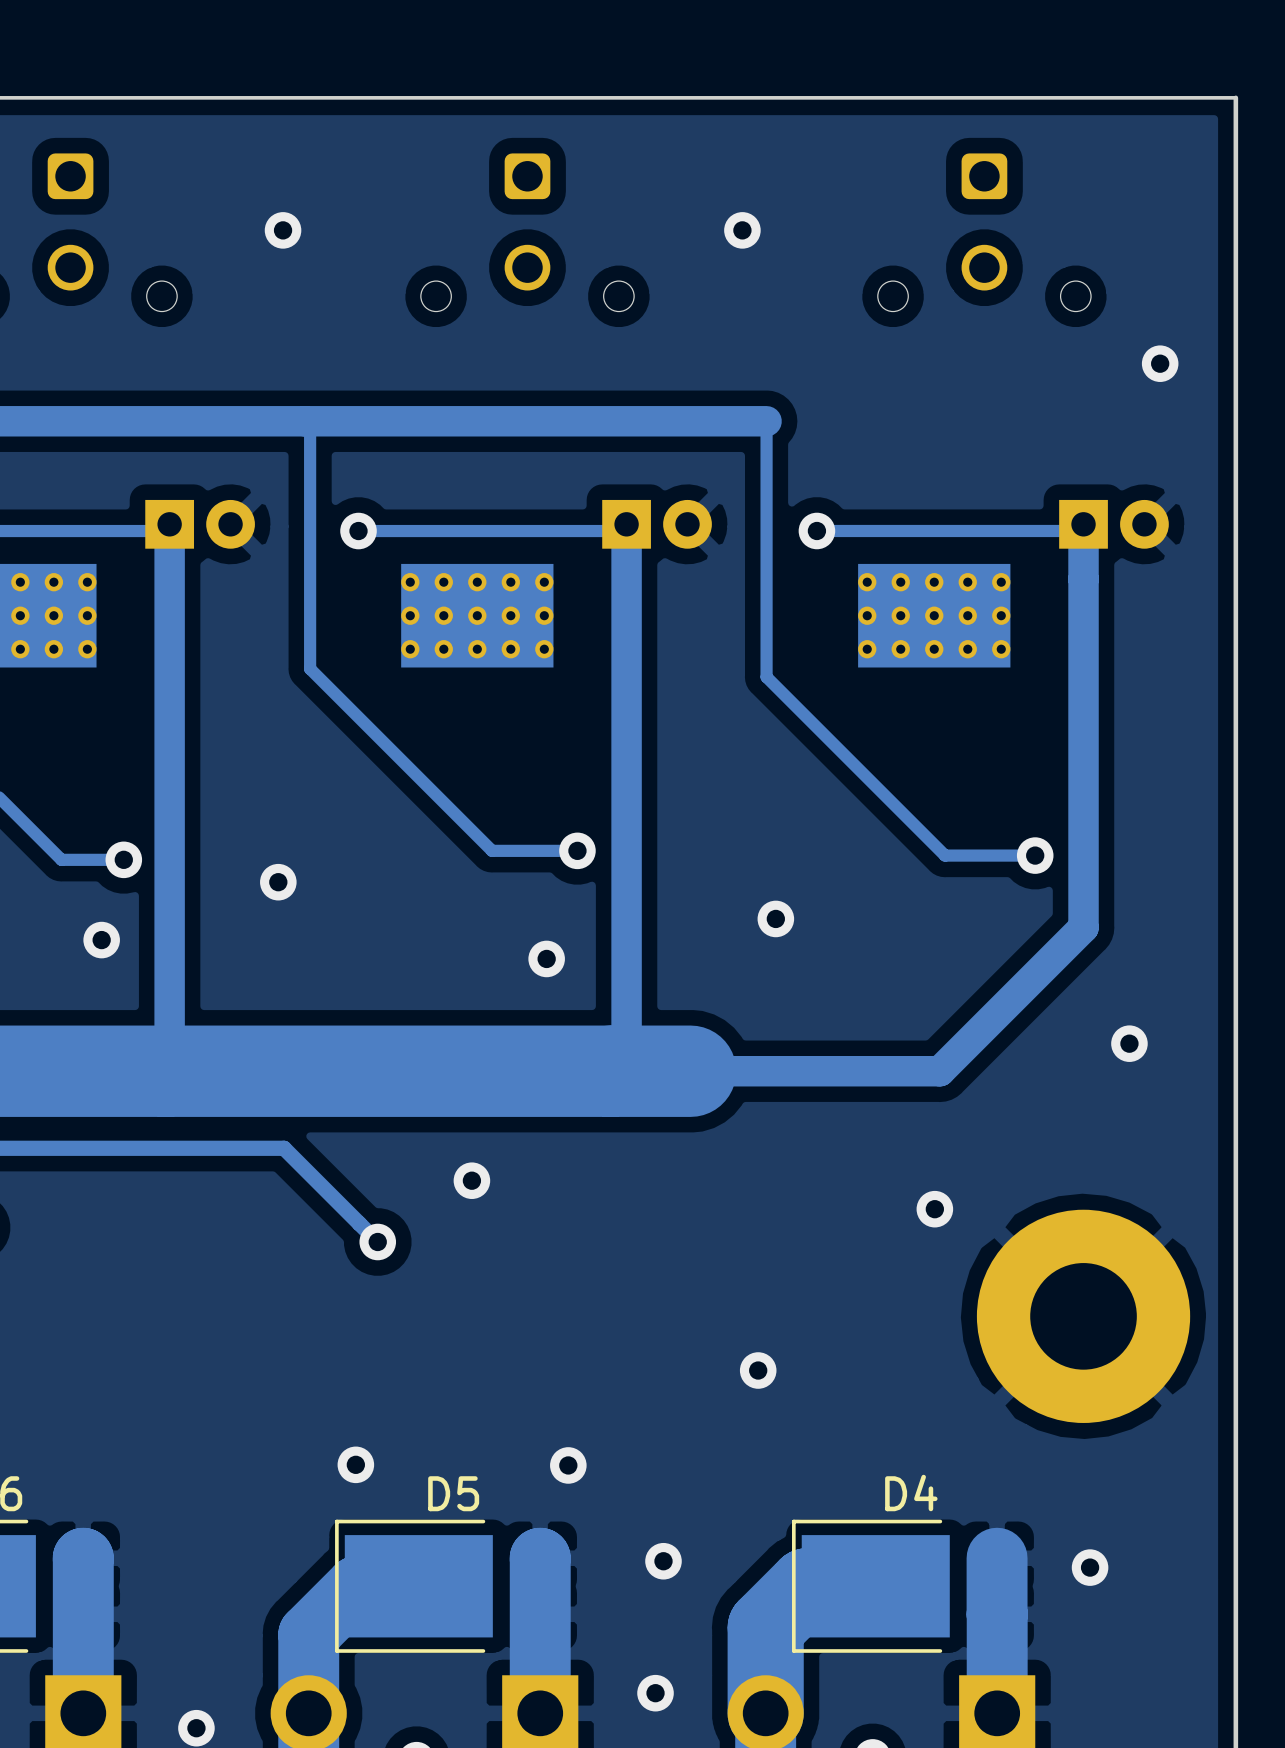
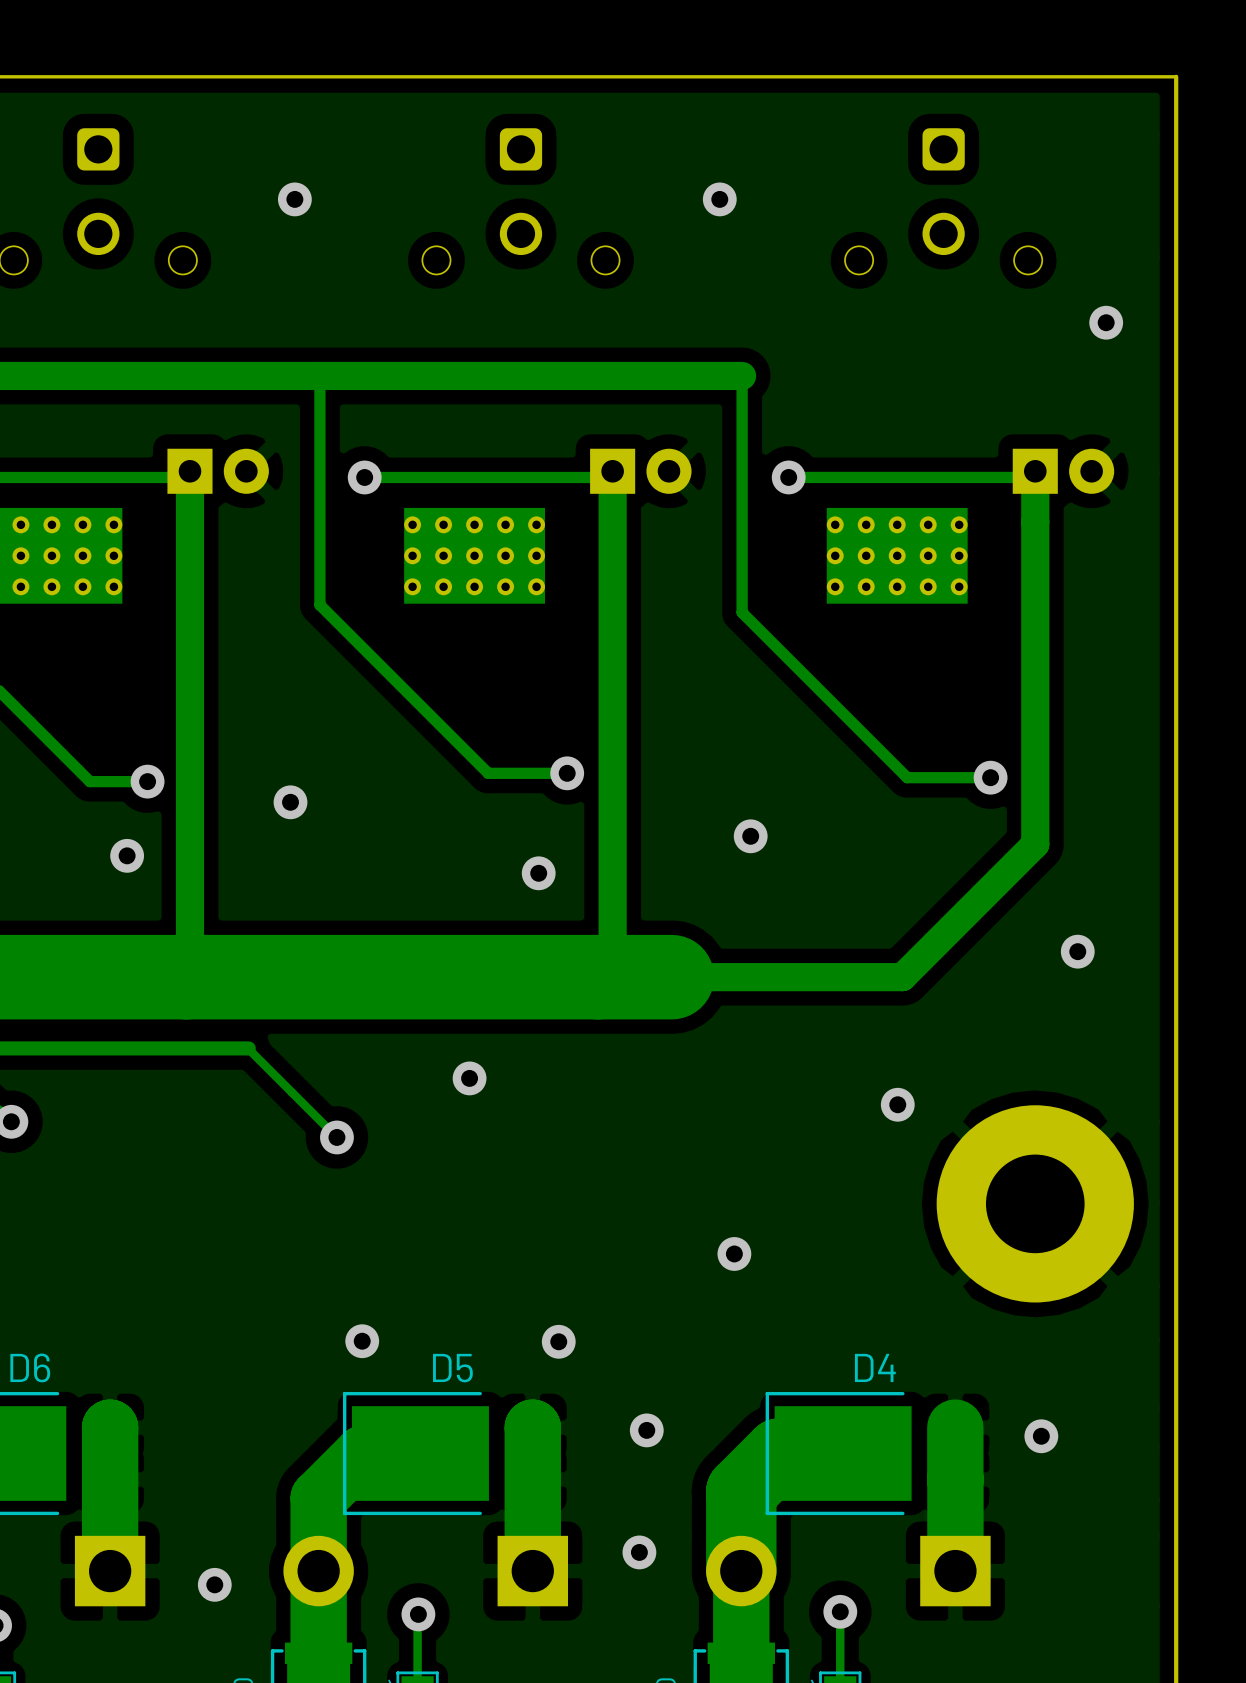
track: (233, 1148) (284, 1148) (377, 1241) -> (248, 1048) (336, 1137)
via position: (377, 1241) -> (336, 1137)

